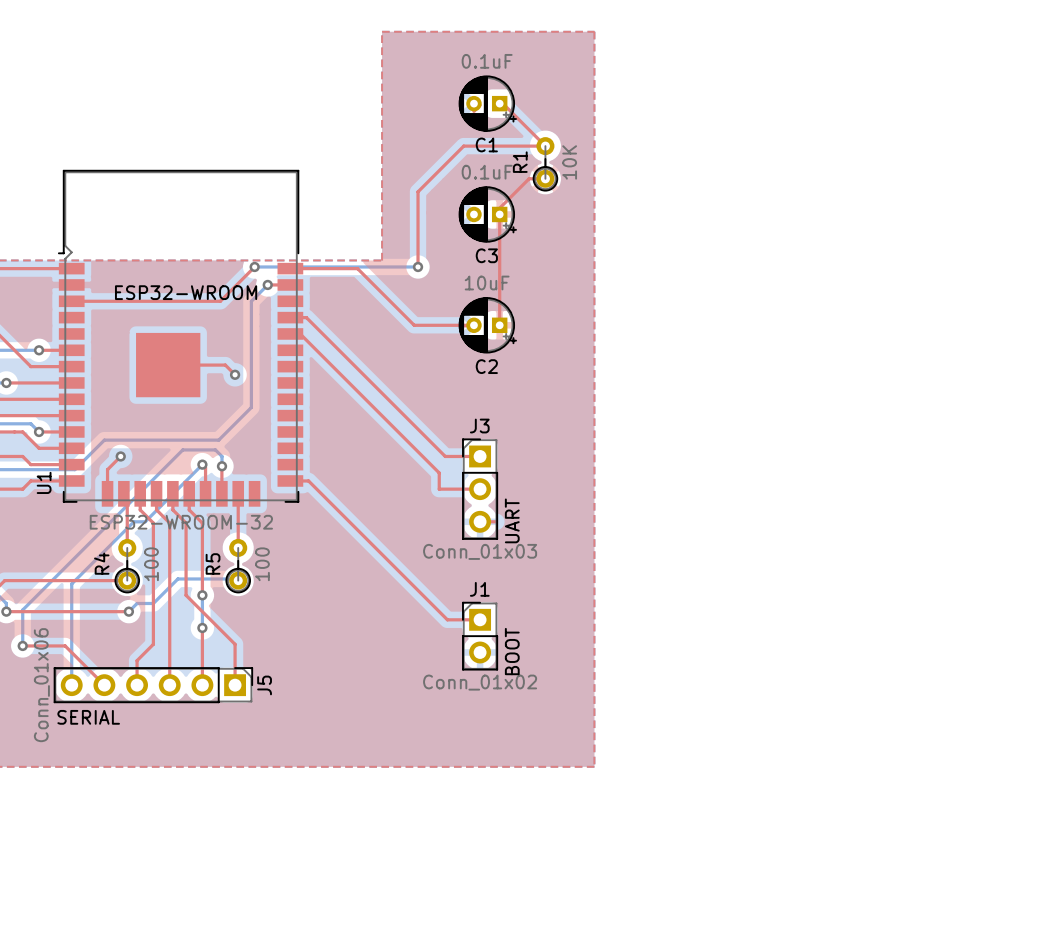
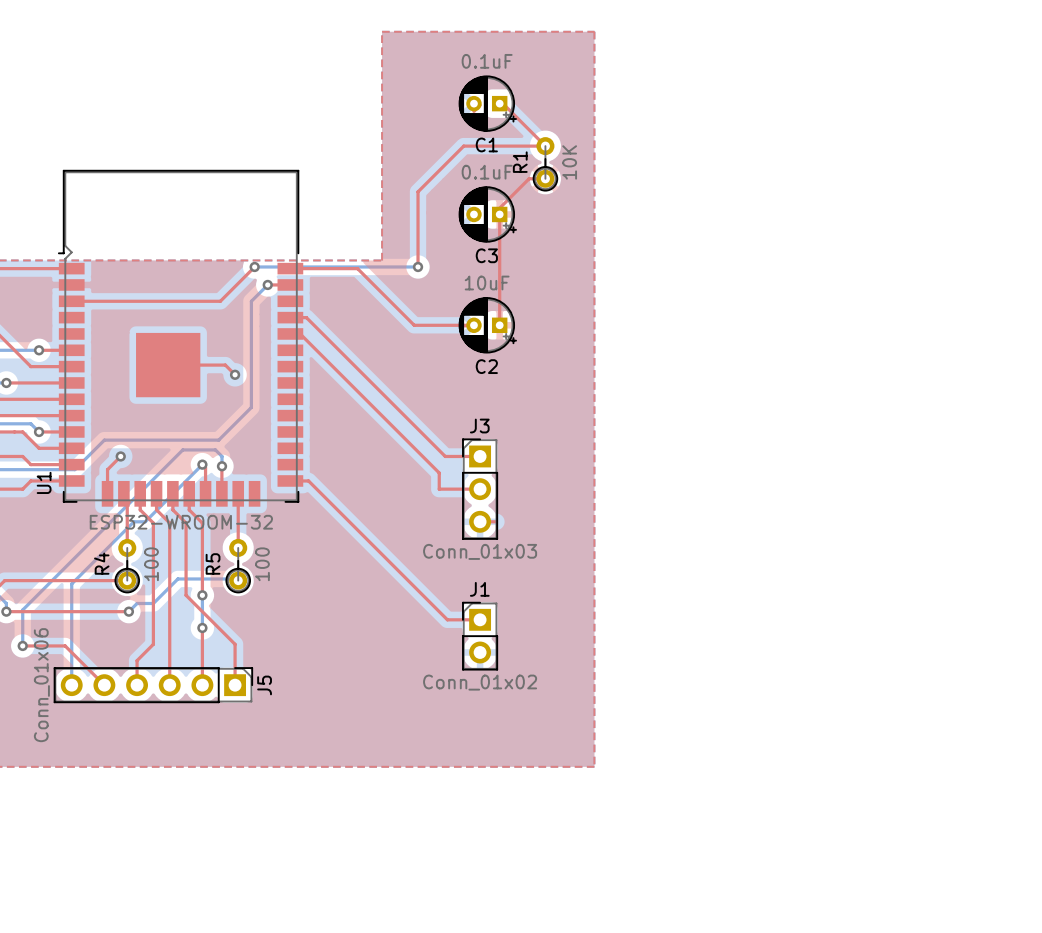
text: ESP32-WROOM (186, 292) -> none
text: UART (512, 520) -> none
text: BOOT (512, 651) -> none
text: SERIAL (88, 717) -> none

